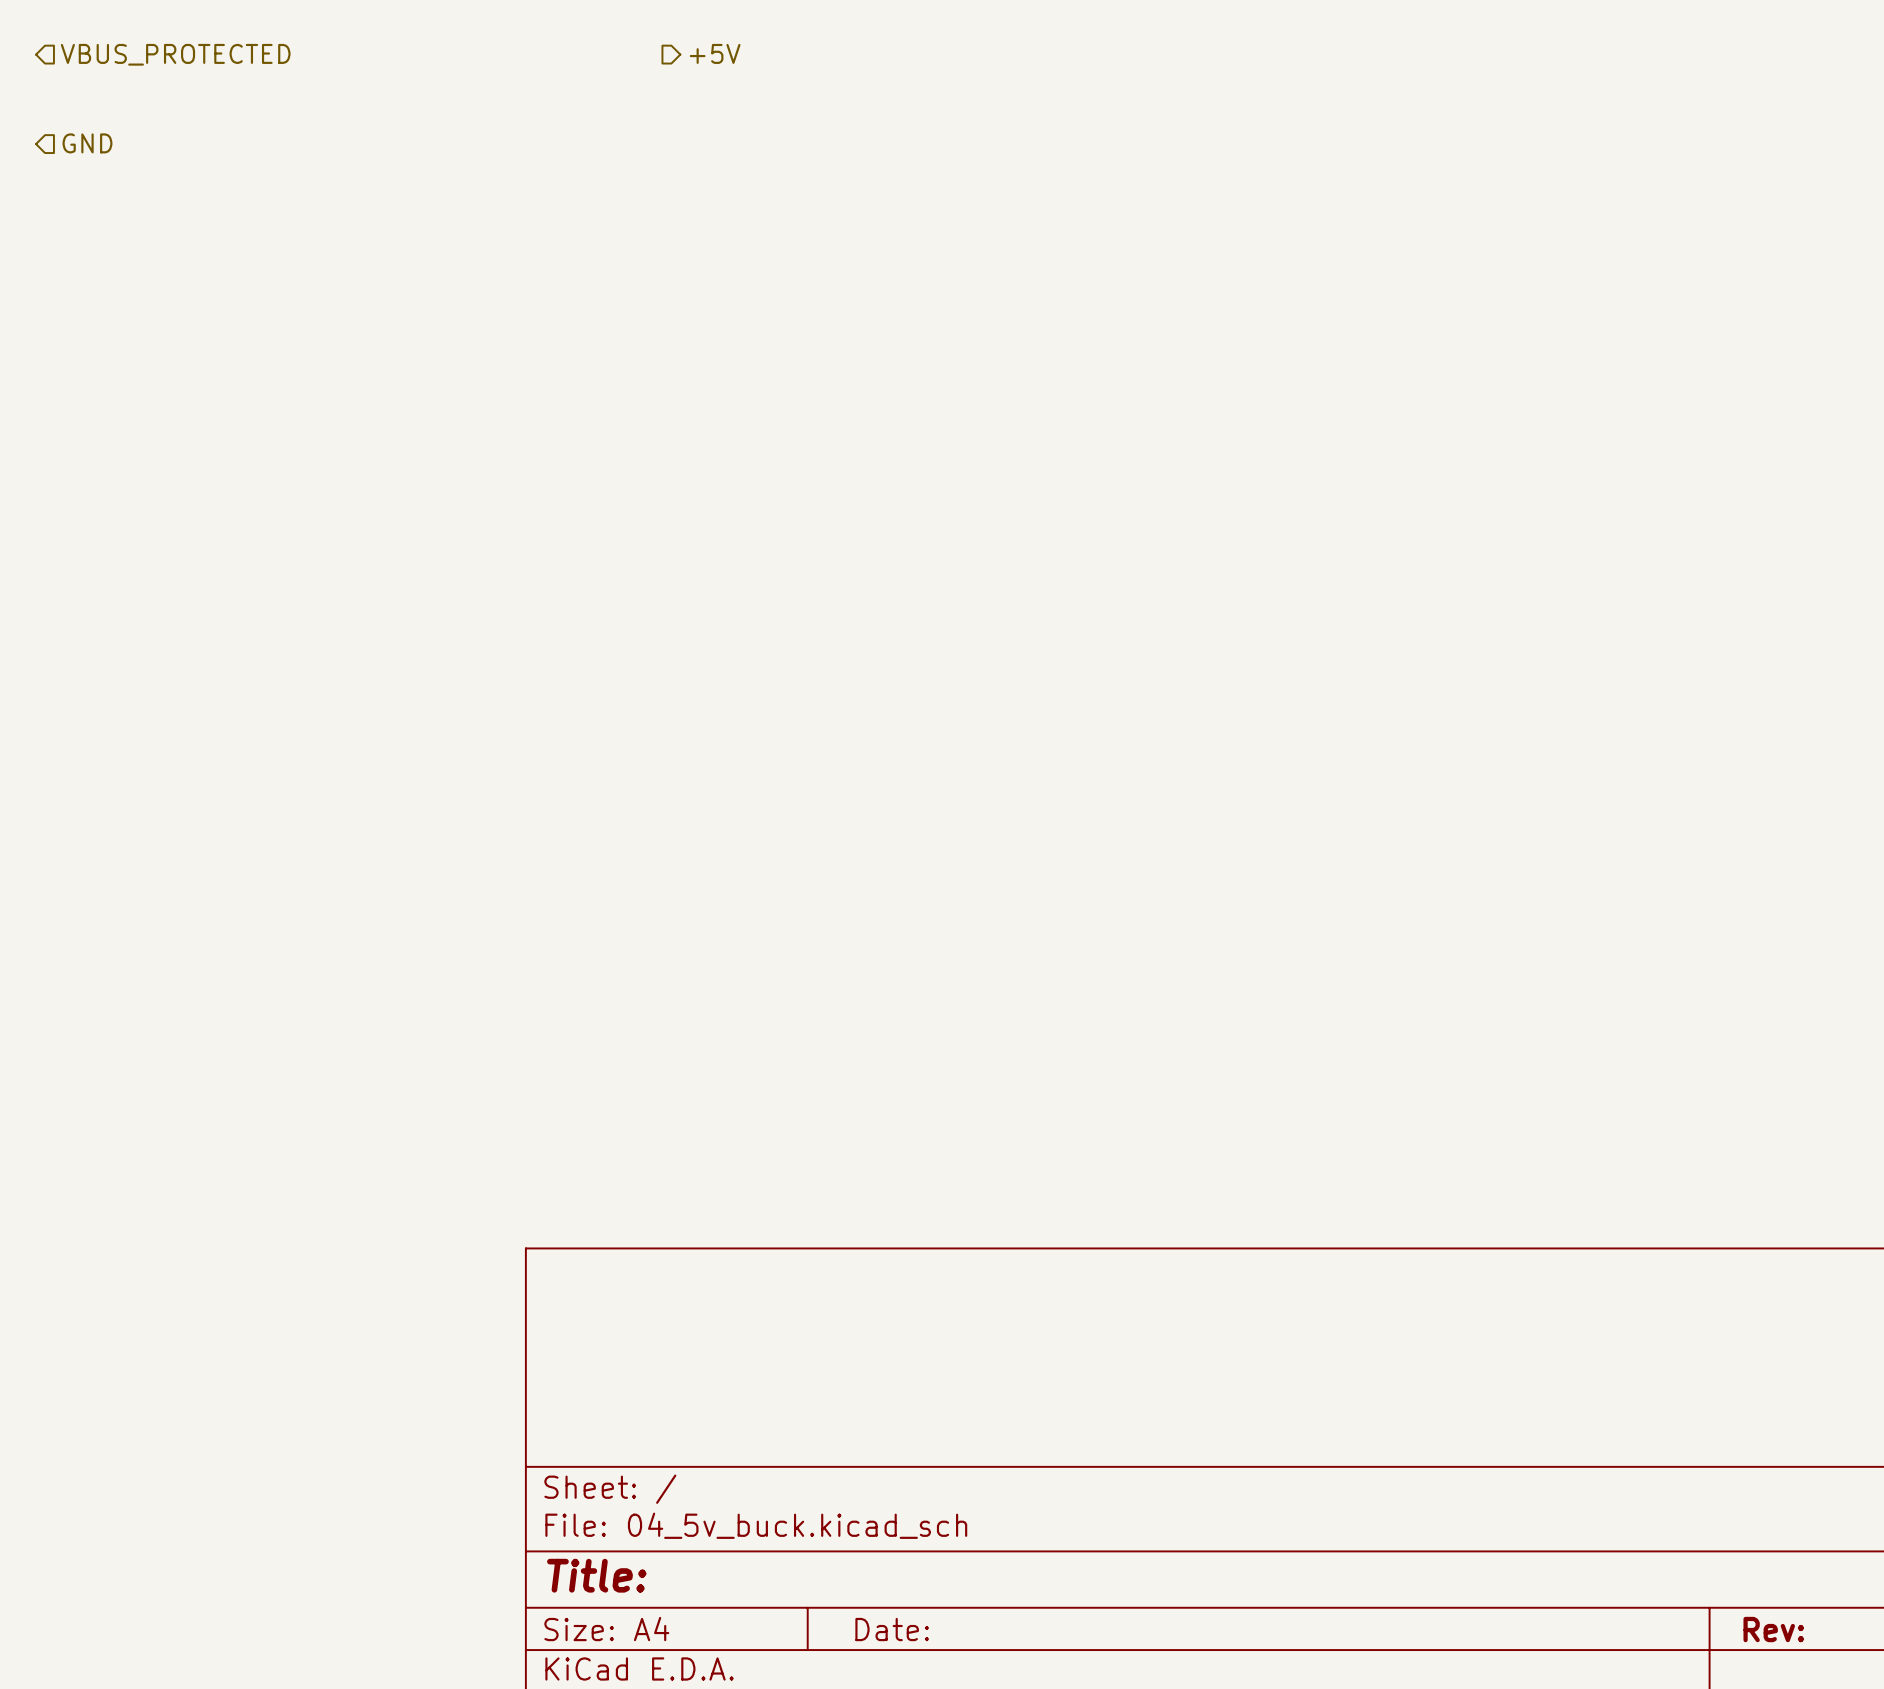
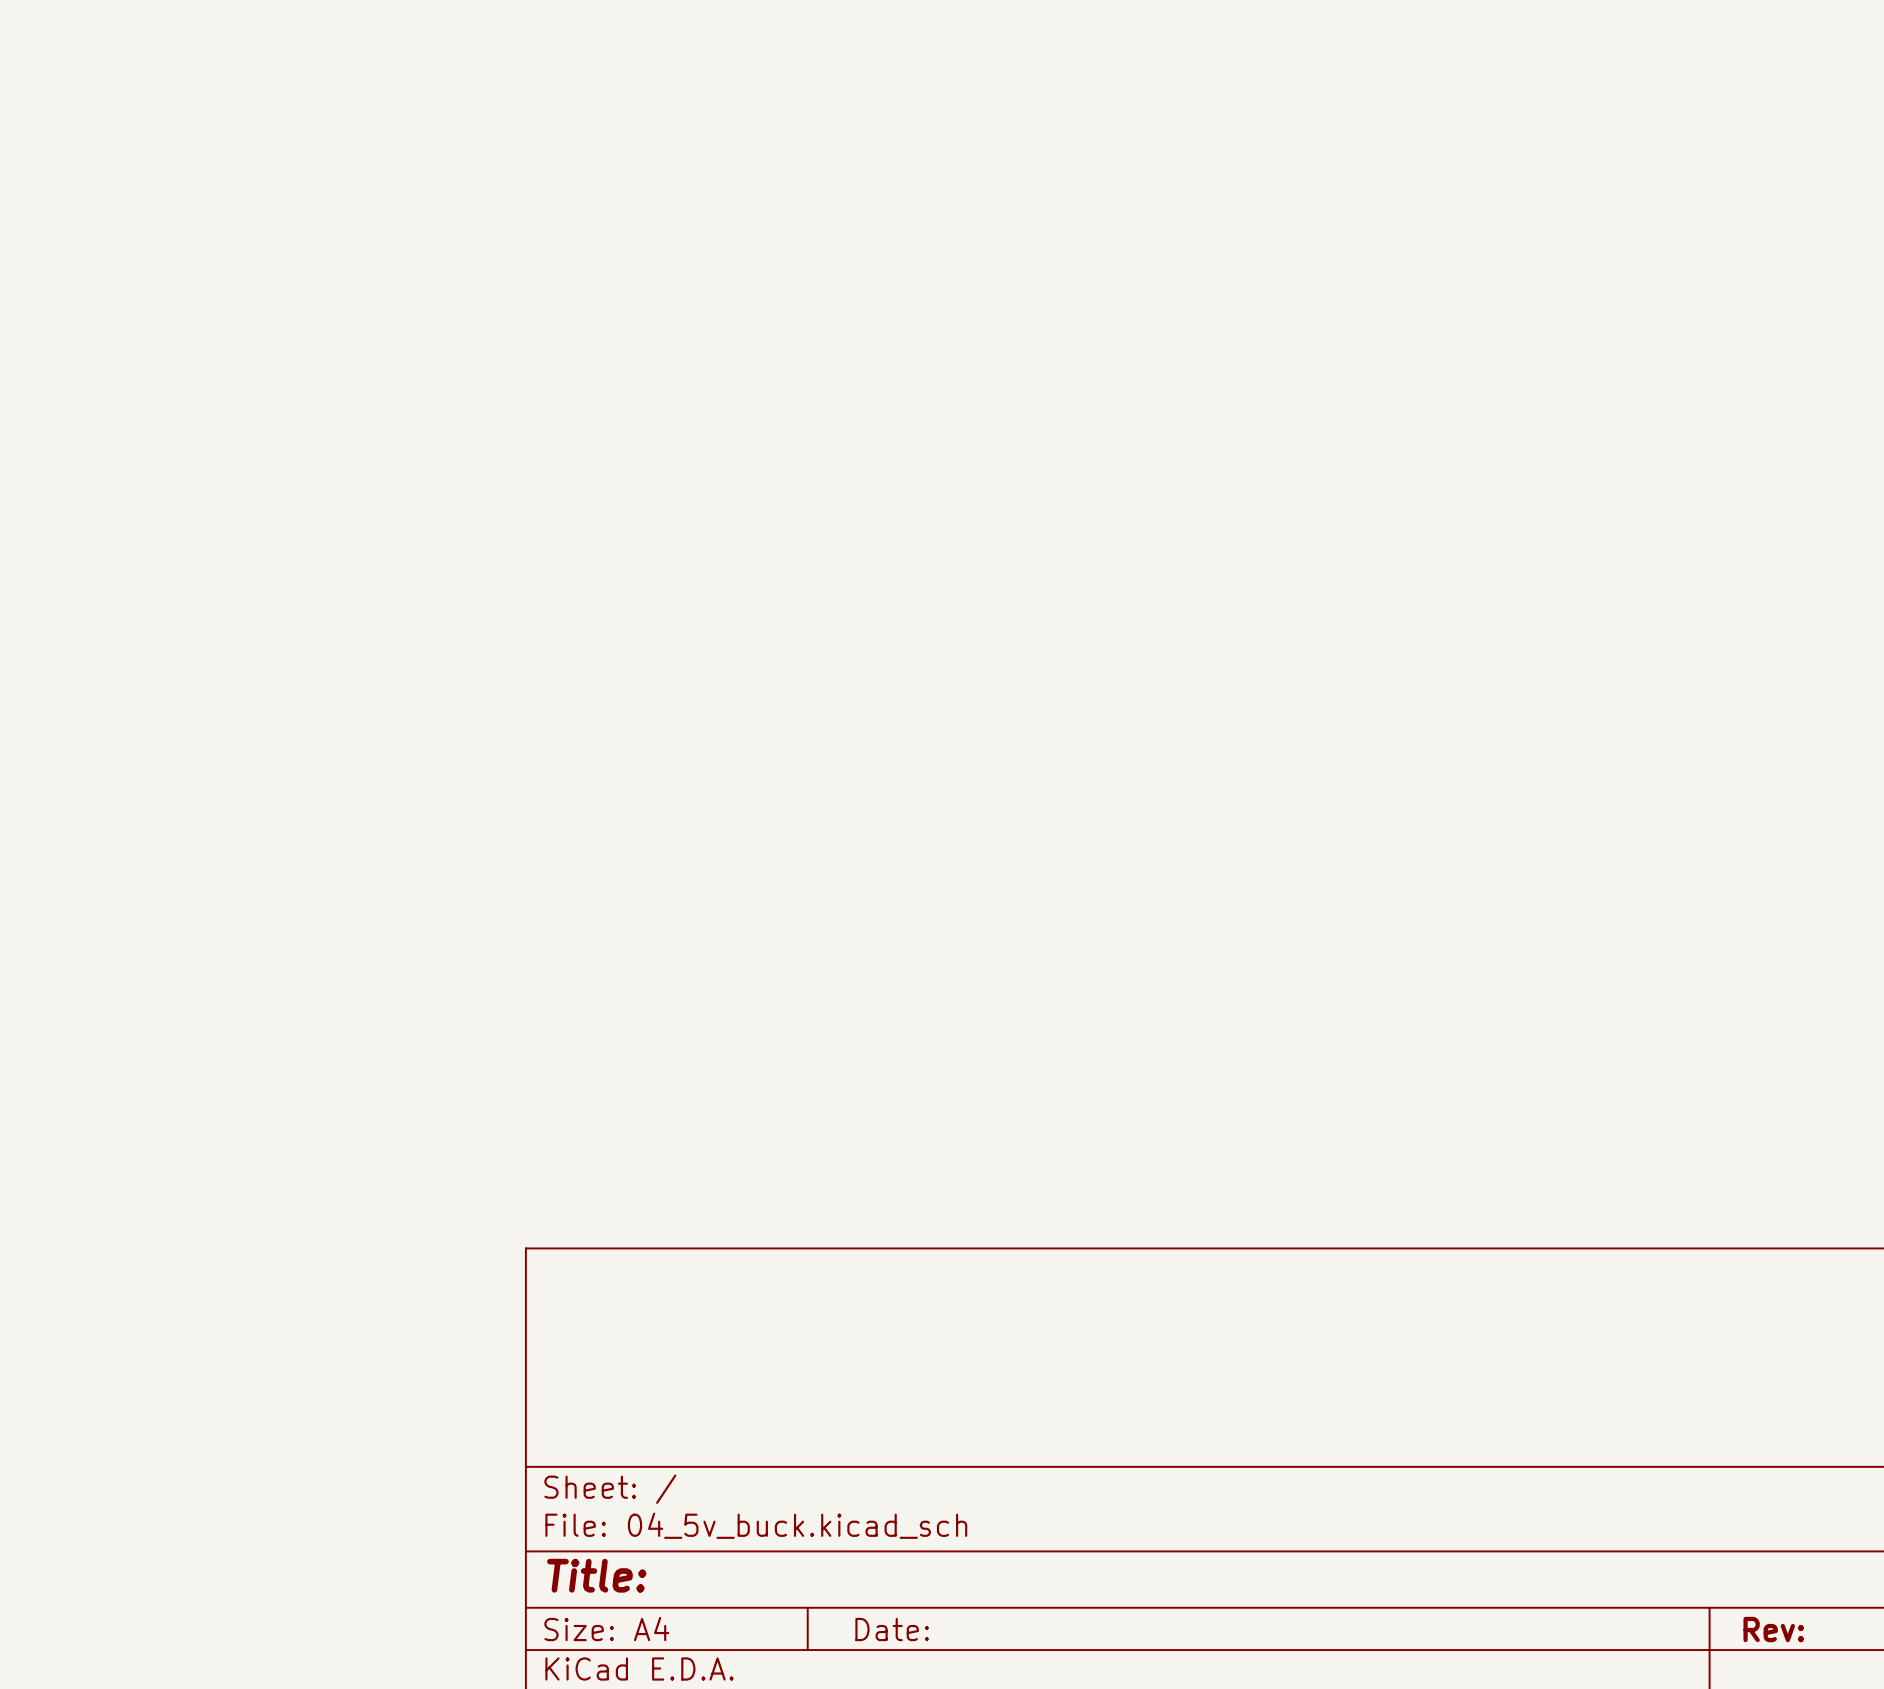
hierarchical label: +5V (715, 53) -> none
hierarchical label: VBUS_PROTECTED (175, 54) -> none
hierarchical label: GND (87, 143) -> none

